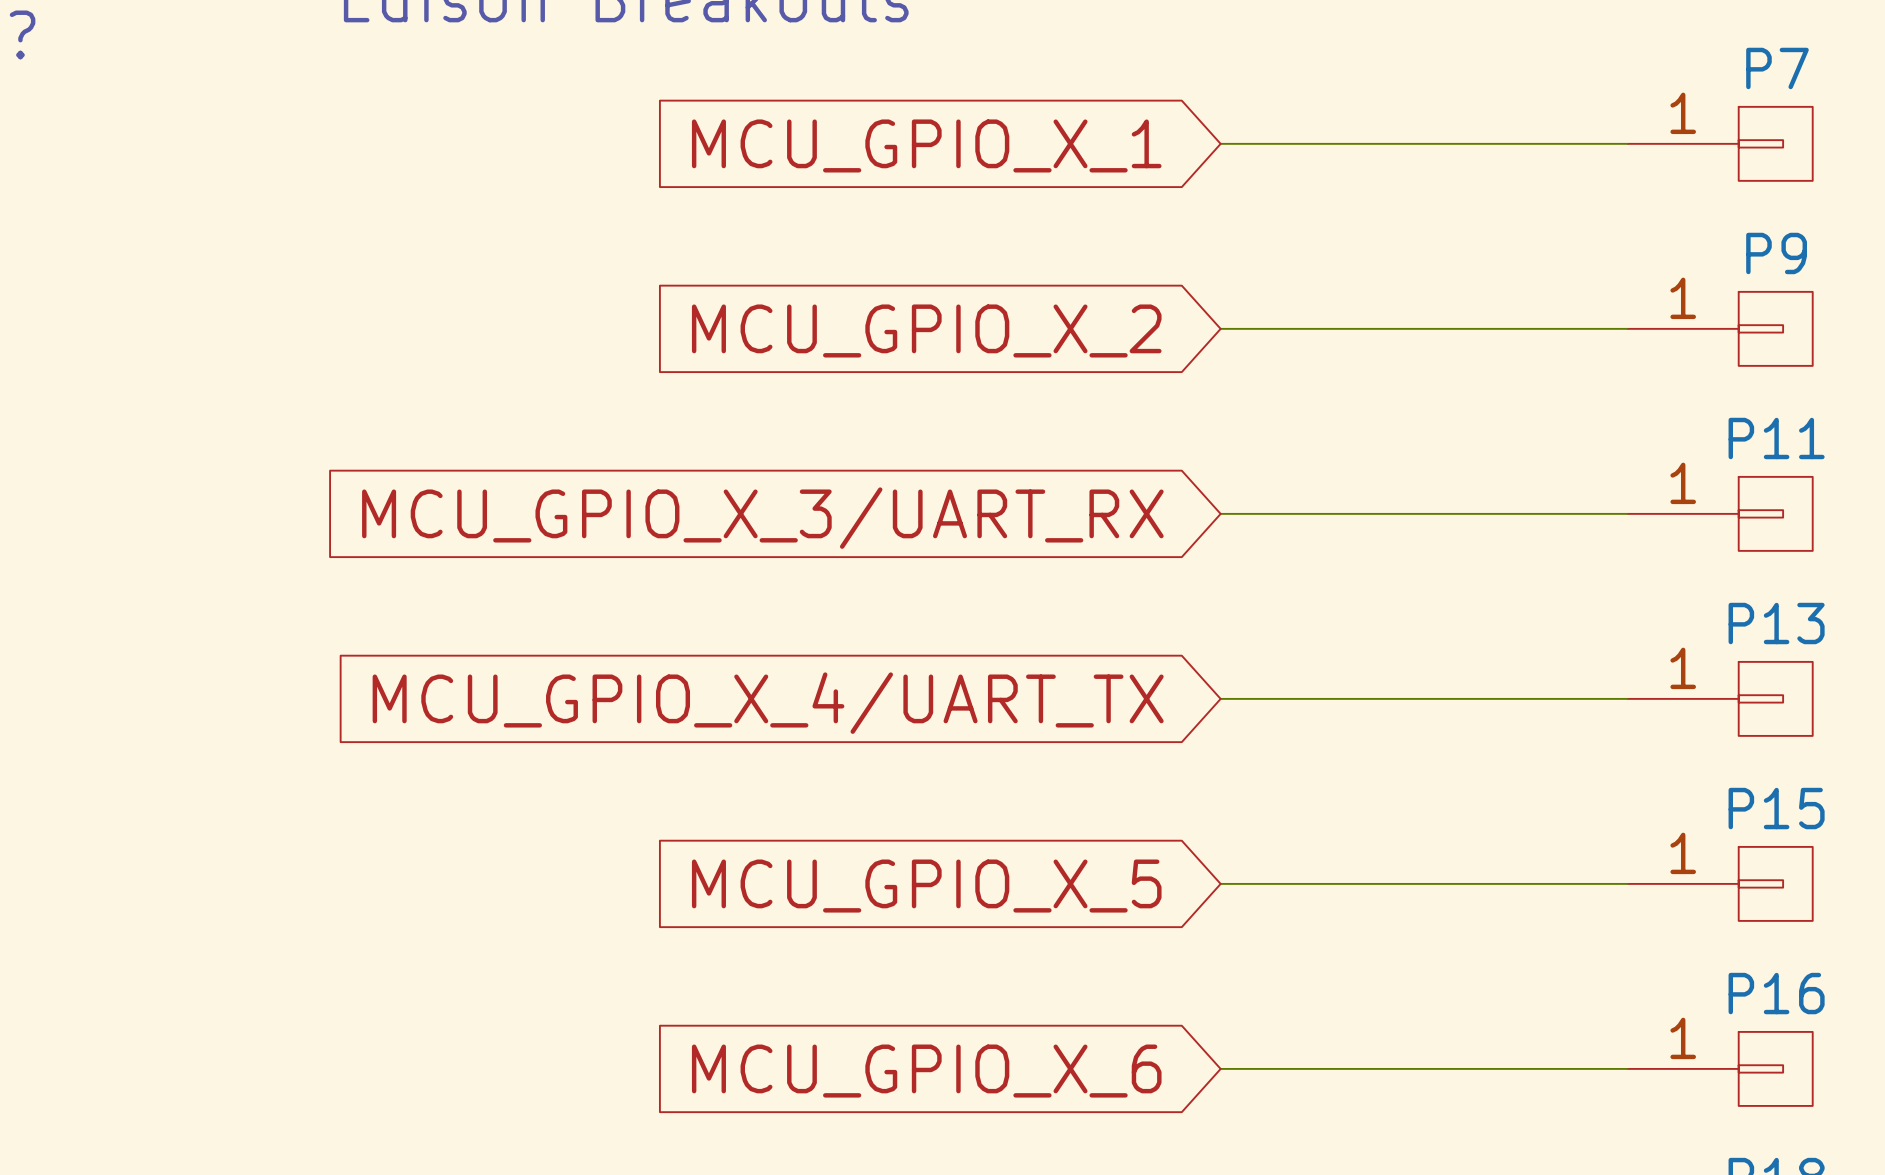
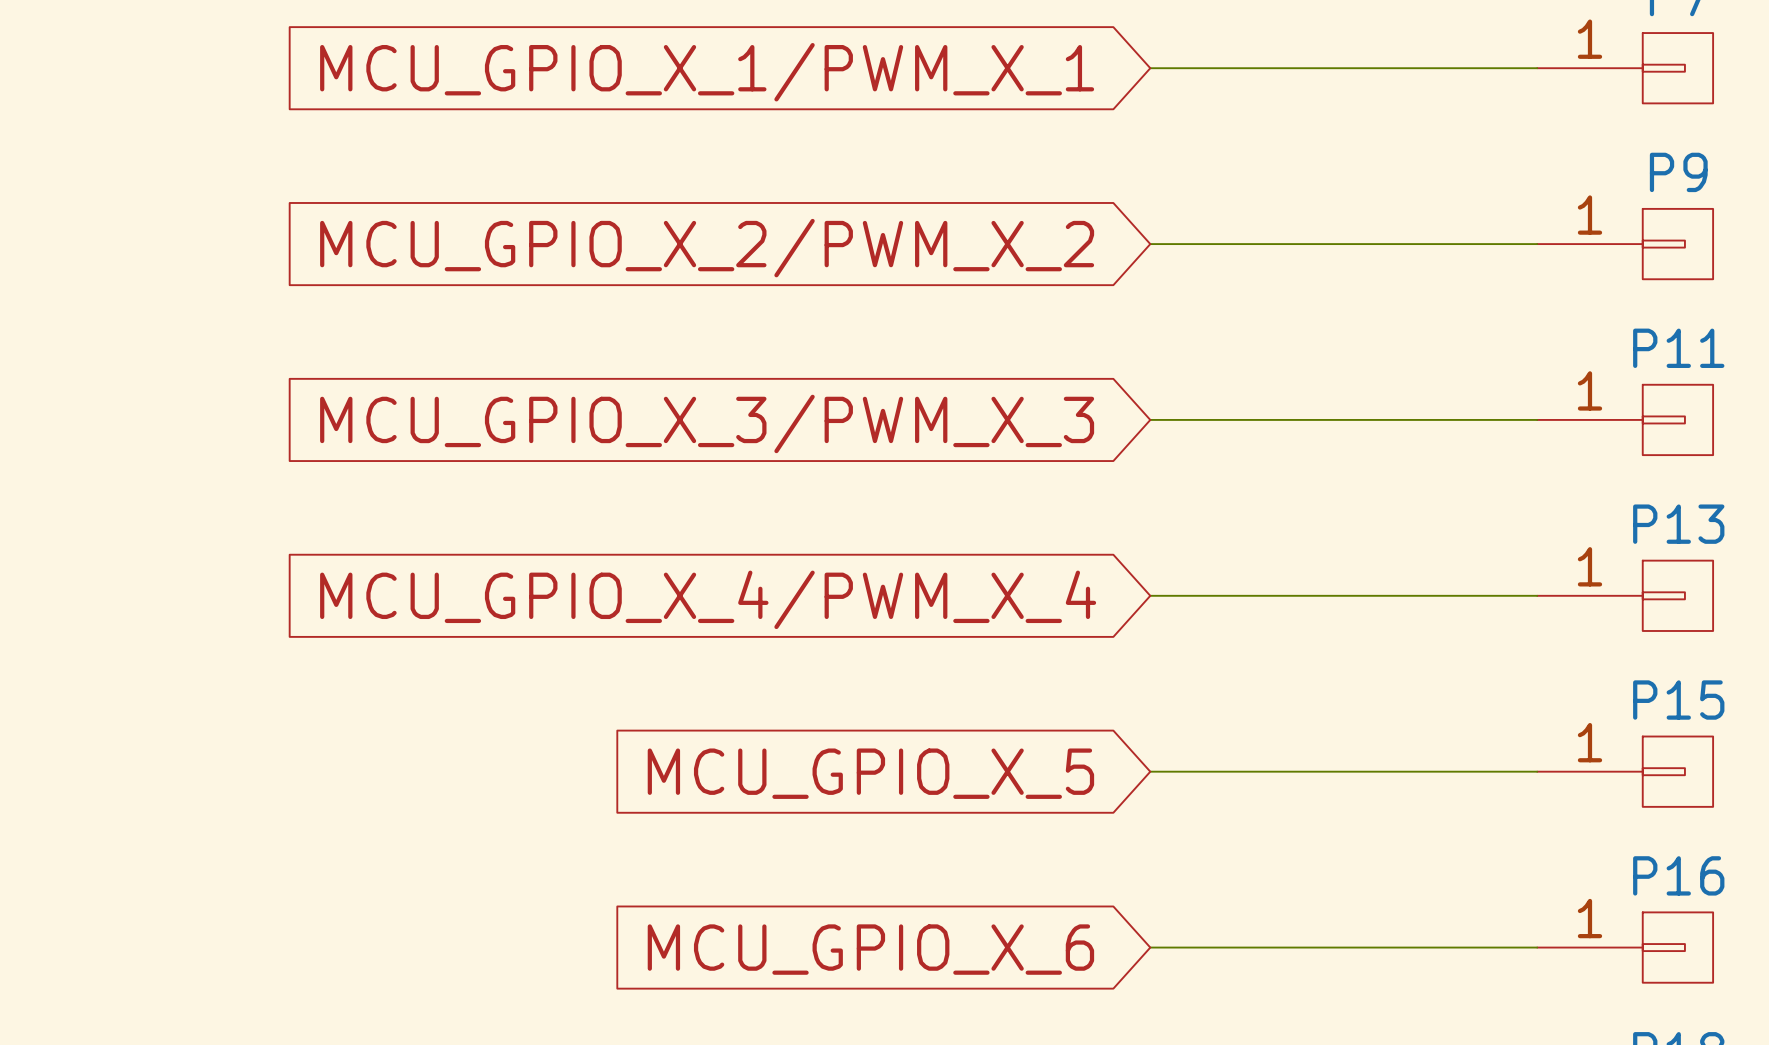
global label: MCU_GPIO_X_1 (926, 145) -> MCU_GPIO_X_1/PWM_X_1 (707, 72)
global label: MCU_GPIO_X_2 (926, 330) -> MCU_GPIO_X_2/PWM_X_2 (707, 248)
global label: MCU_GPIO_X_3/UART_RX (762, 518) -> MCU_GPIO_X_3/PWM_X_3 (707, 423)
global label: MCU_GPIO_X_4/UART_TX (768, 703) -> MCU_GPIO_X_4/PWM_X_4 (708, 599)

